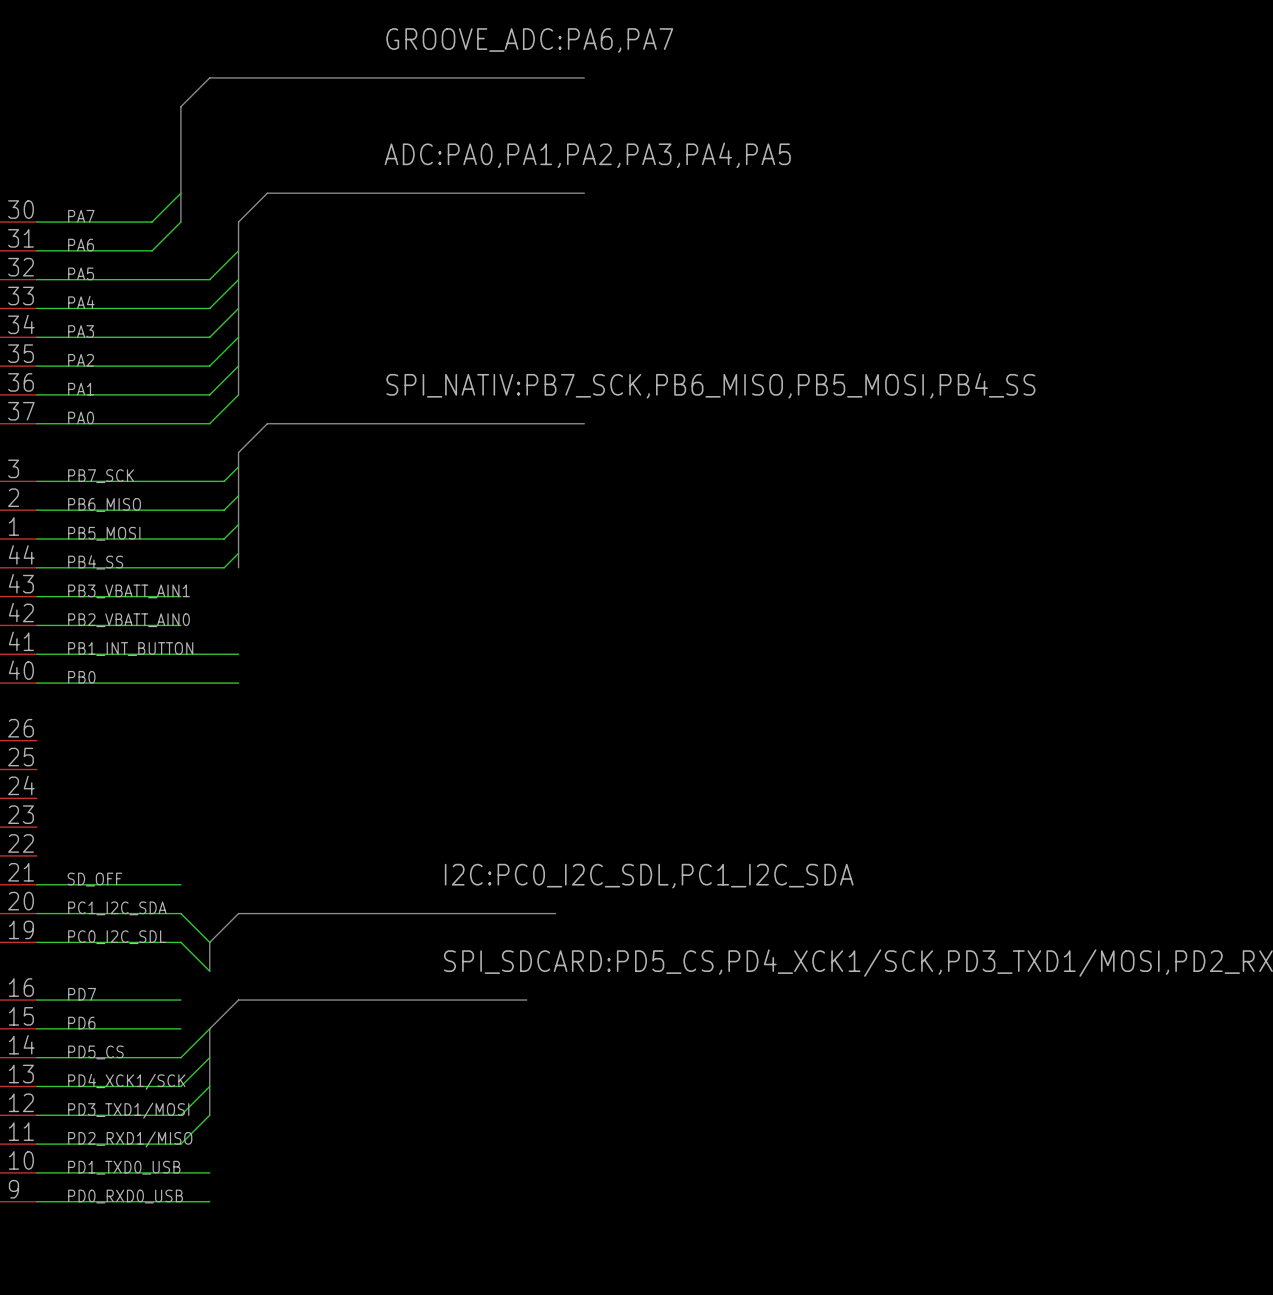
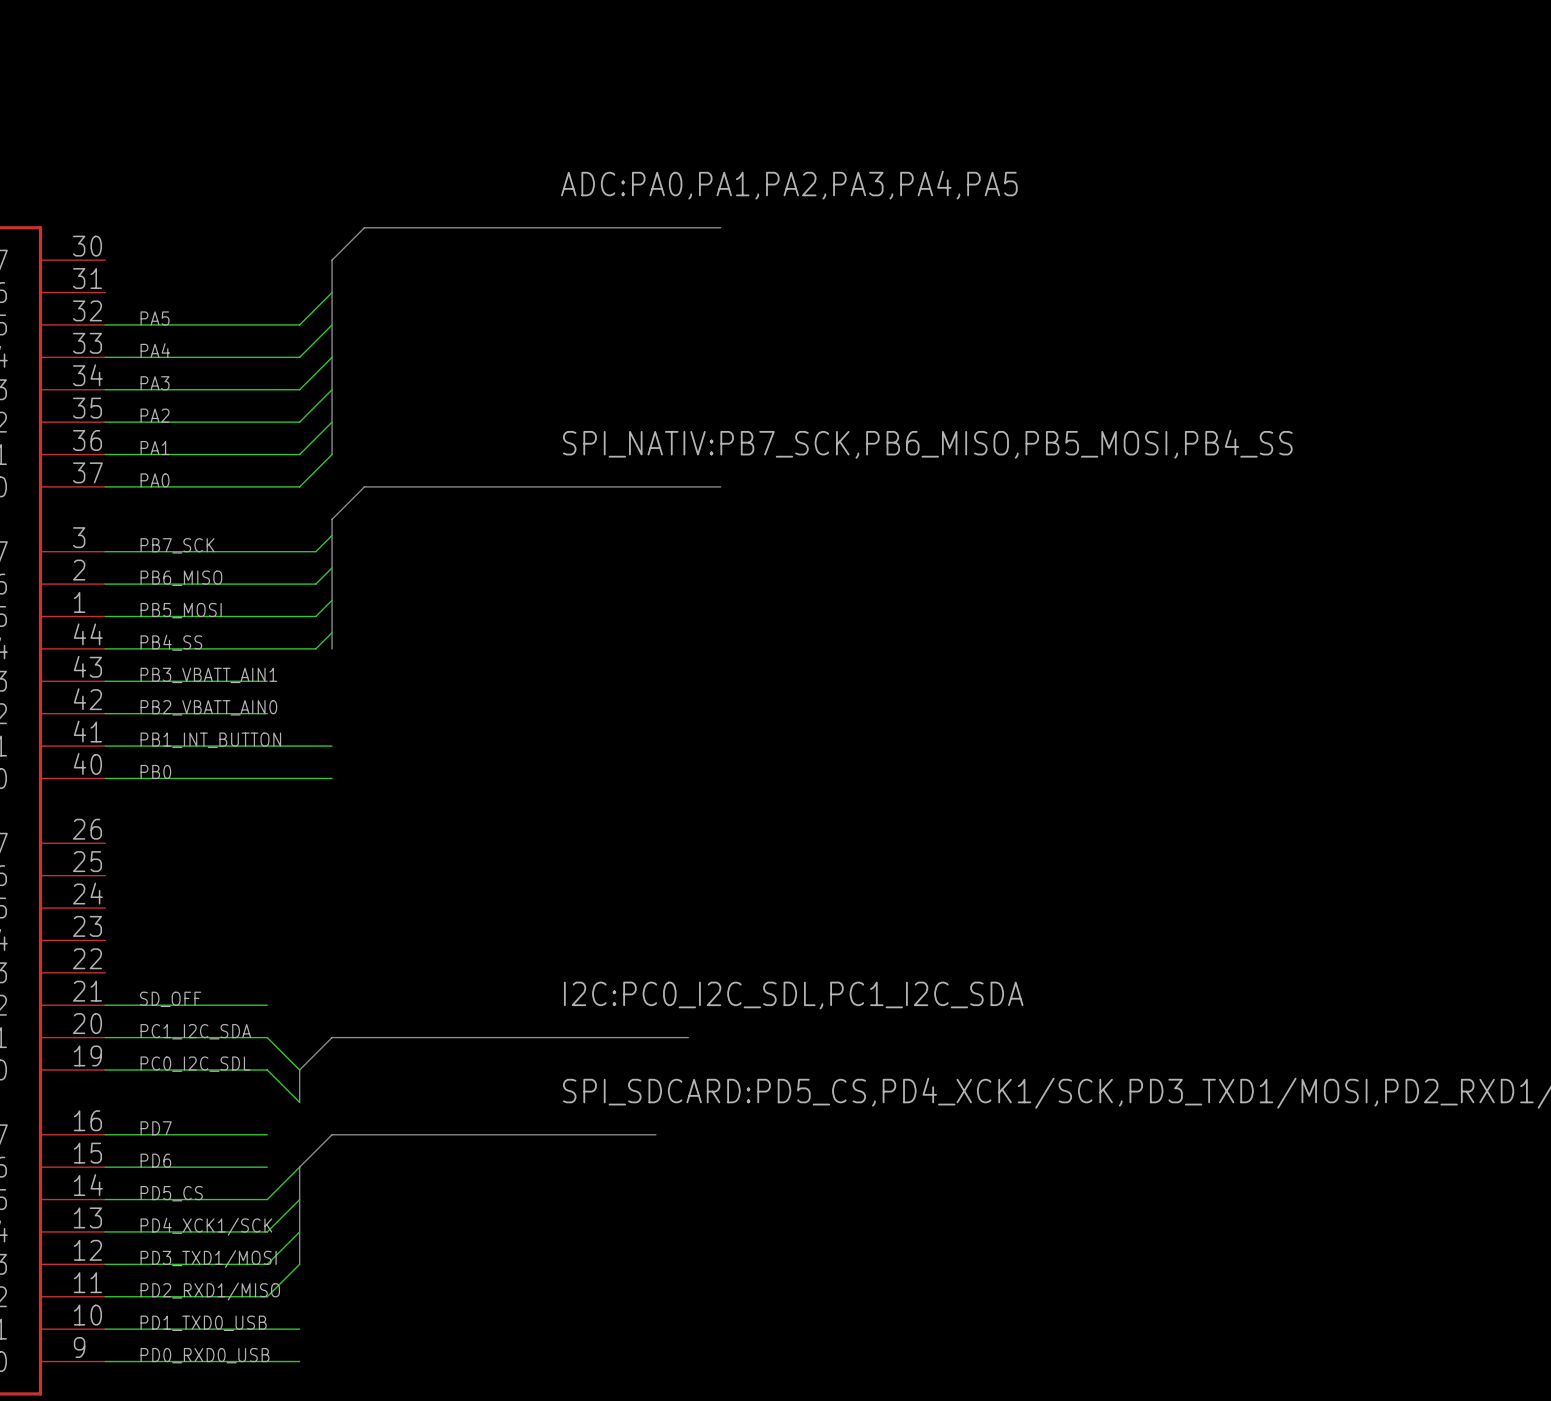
label: GROOVE_ADC:PA6,PA7 (529, 40) -> none
bus: (584, 77) (209, 77) (180, 106) (180, 222) -> none
label position: ADC:PA0,PA1,PA2,PA3,PA4,PA5 (587, 155) -> ADC:PA0,PA1,PA2,PA3,PA4,PA5 (789, 185)
wire: (180, 193) (152, 222) (36, 222) -> none
label: PA7 (81, 216) -> none
wire: (180, 222) (152, 250) (36, 250) -> none
label: PA6 (81, 245) -> none
label position: SPI_NATIV:PB7_SCK,PB6_MISO,PB5_MOSI,PB4_SS (710, 385) -> SPI_NATIV:PB7_SCK,PB6_MISO,PB5_MOSI,PB4_SS (927, 444)

